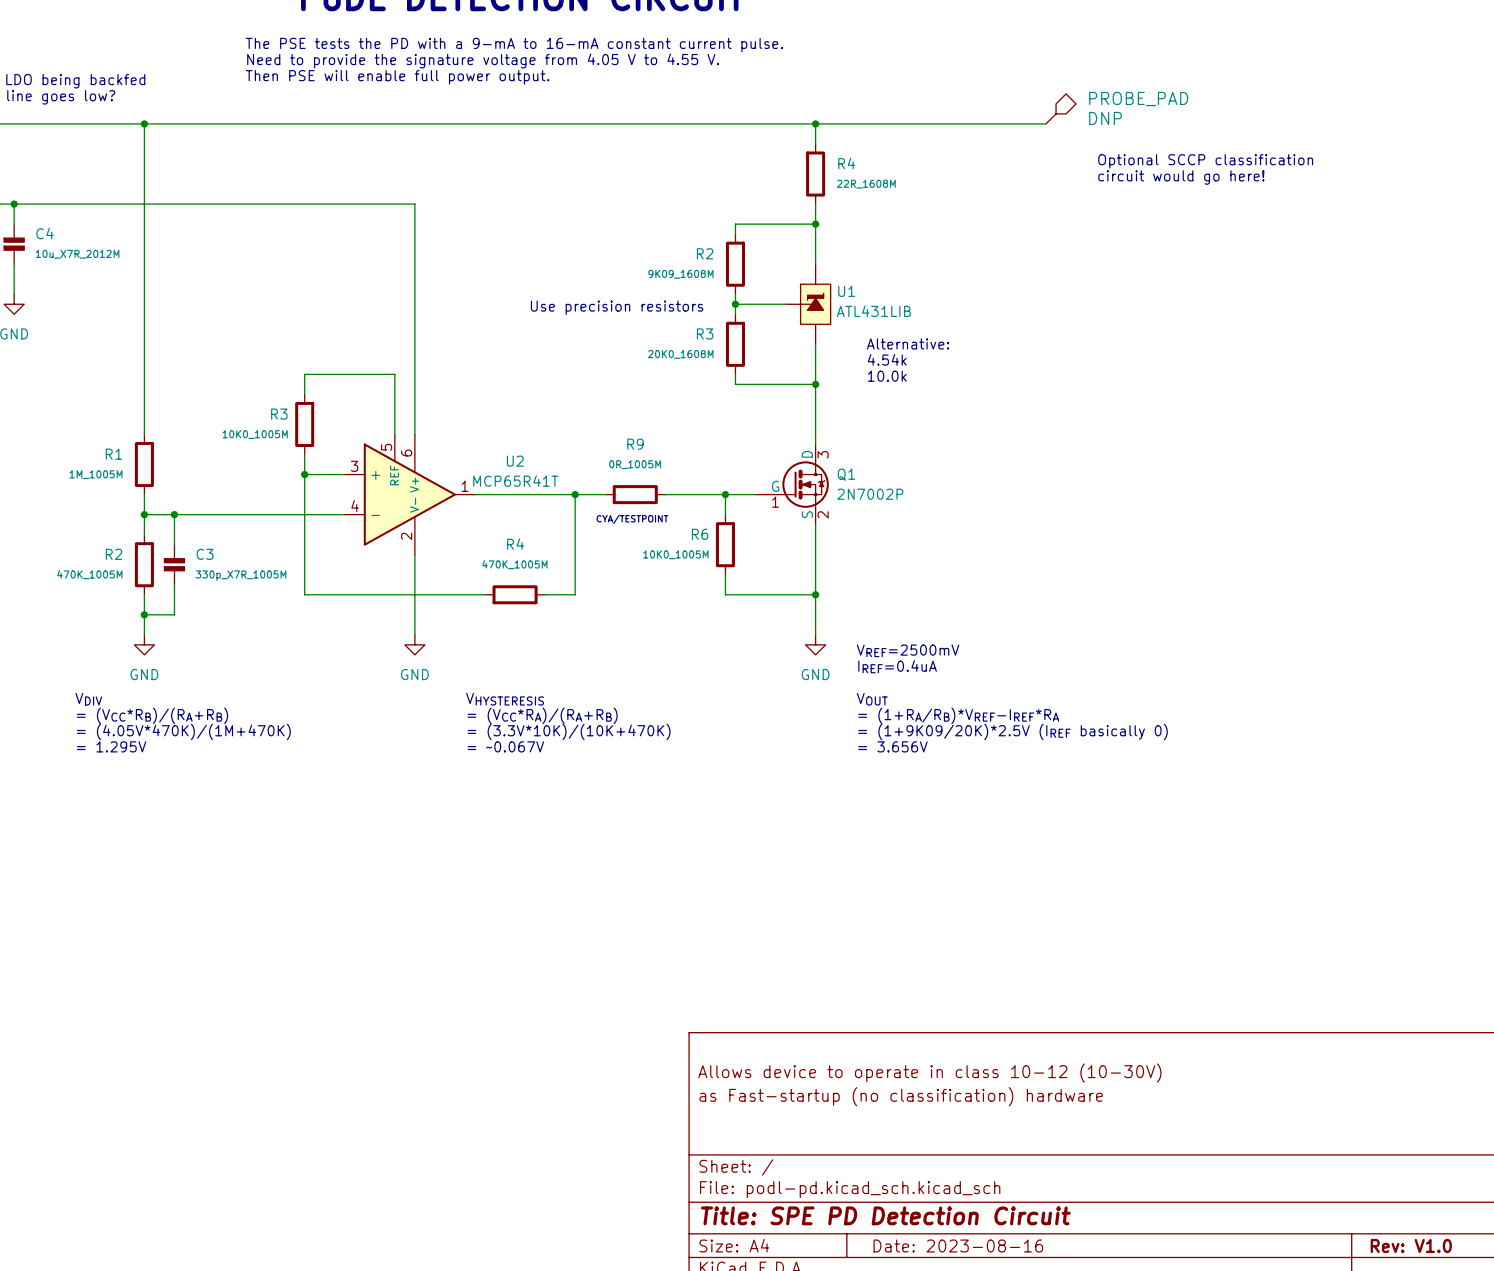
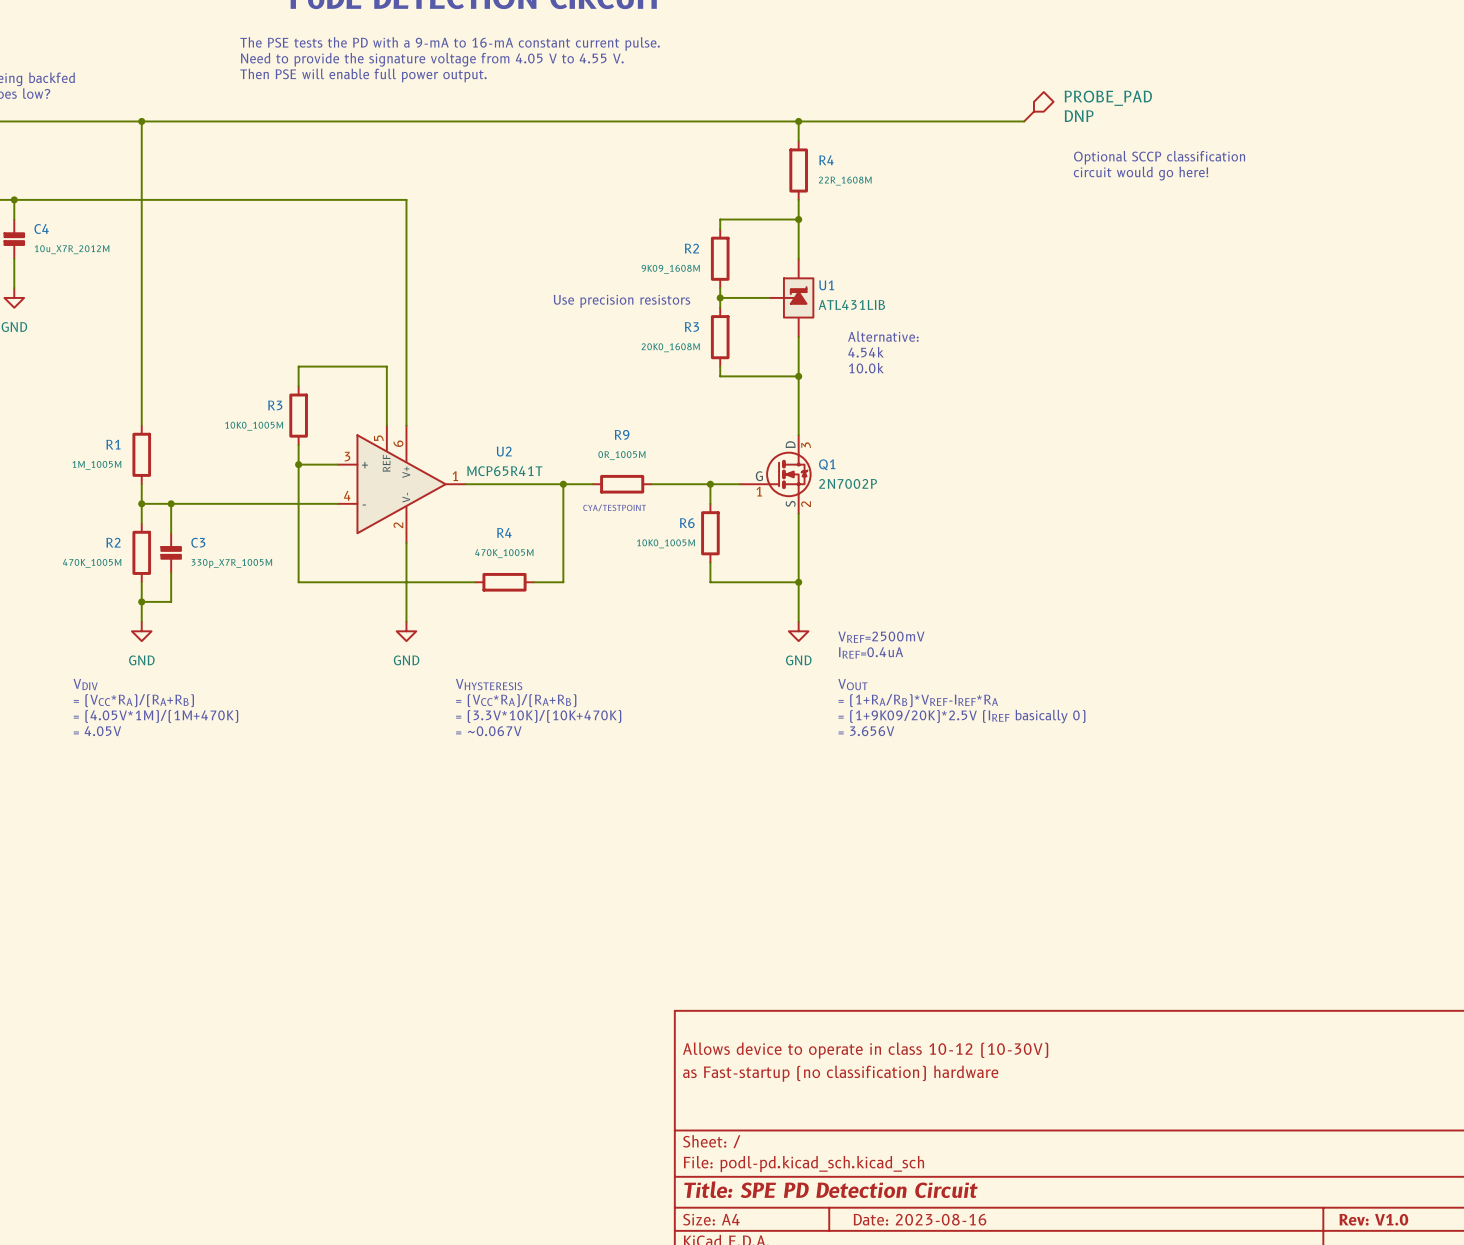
text: = (VCC*RB)/(RA+RB) (152, 715) -> = (VCC*RA)/(RA+RB) (133, 700)
text: = (4.05V*470K)/(1M+470K) (183, 731) -> = (4.05V*1M)/(1M+470K) (156, 716)
text: = 1.295V (111, 746) -> = 4.05V (97, 731)

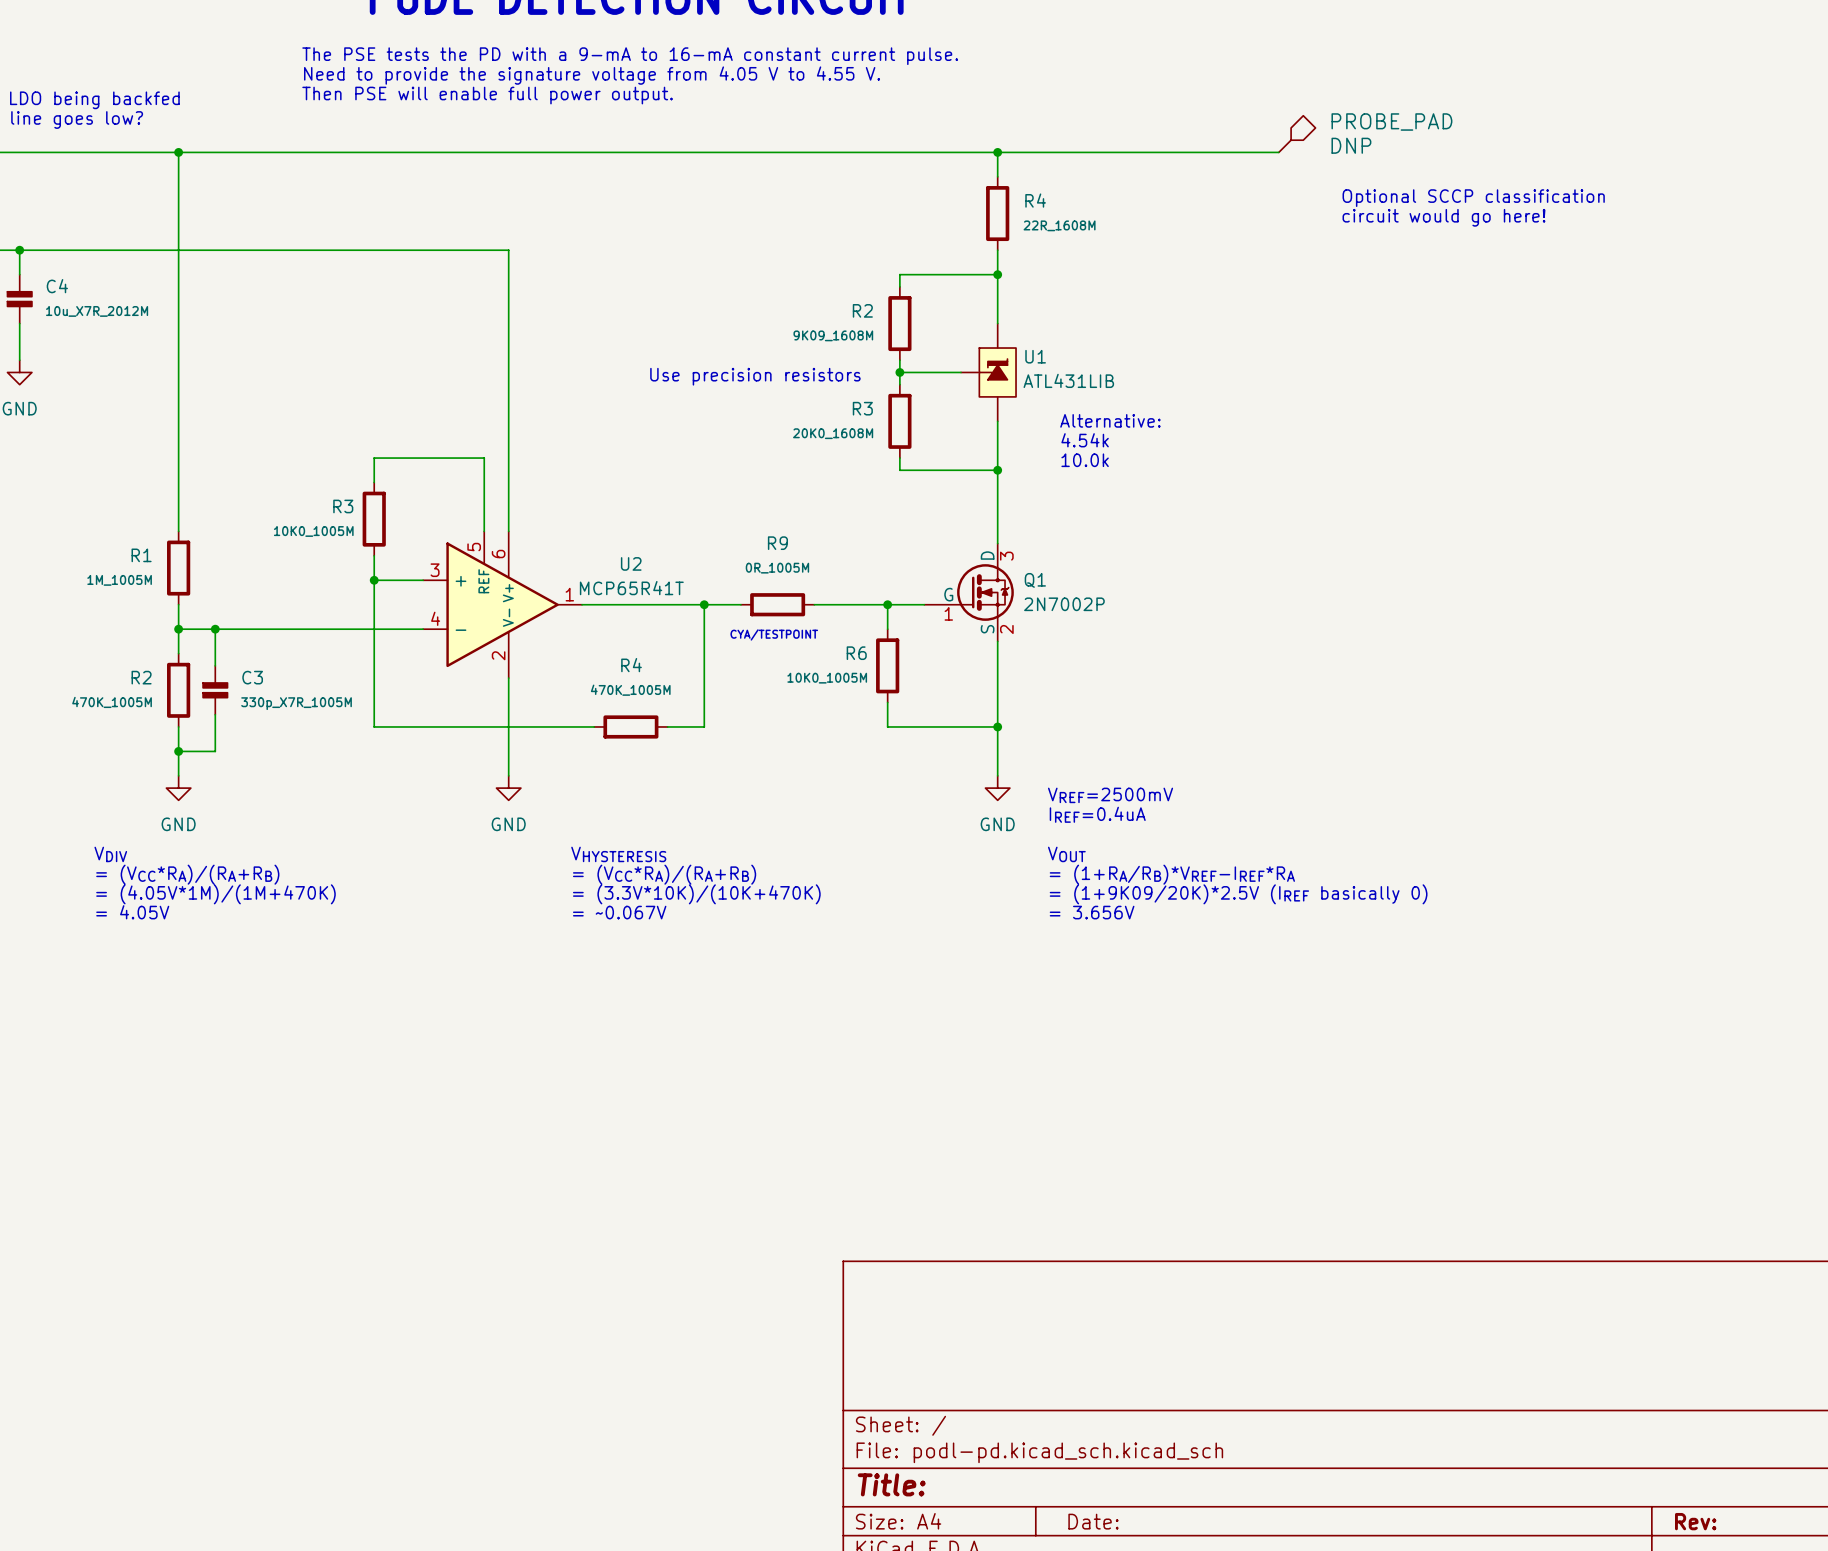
title block: Allows device to operate in class 10-12 (10-30V) (865, 1050) -> none
title block: as Fast-startup (no classification) hardware (840, 1073) -> none
title block: Title: SPE PD Detection Circuit (831, 1189) -> Title: (891, 1484)
title block: Date: 2023-08-16 (919, 1219) -> Date: (1093, 1521)
title block: Rev: V1.0 (1373, 1219) -> Rev: (1695, 1521)

